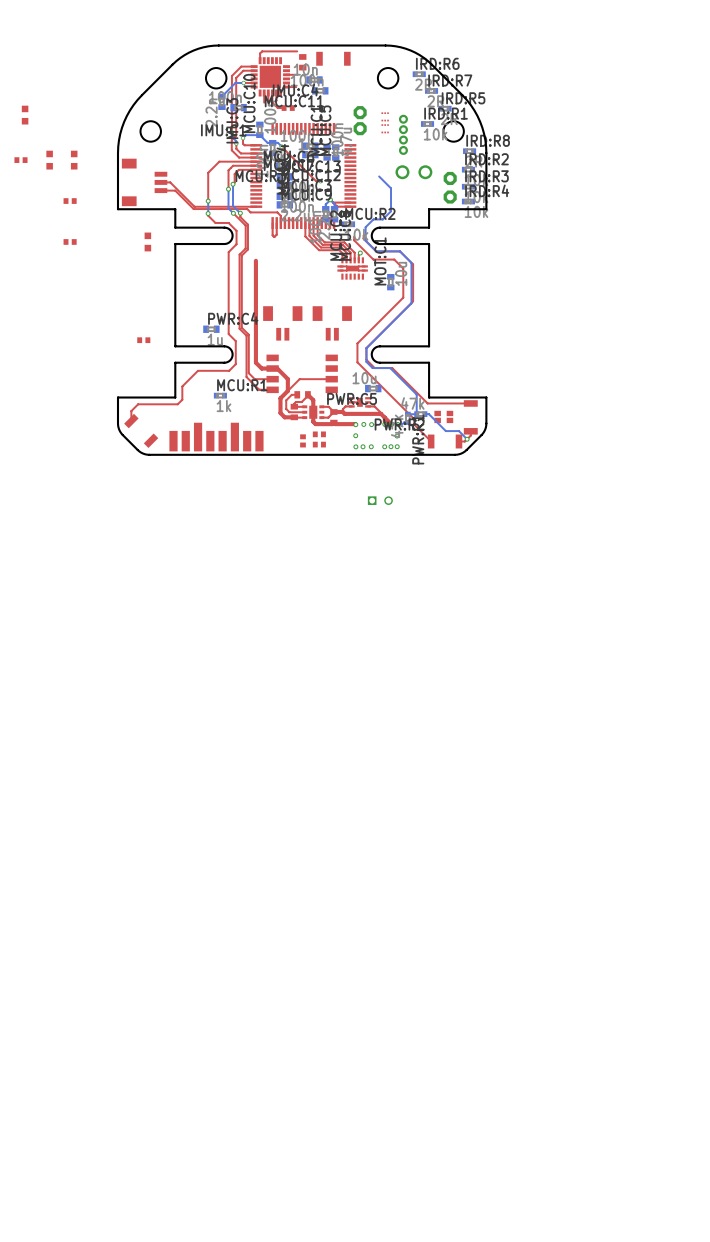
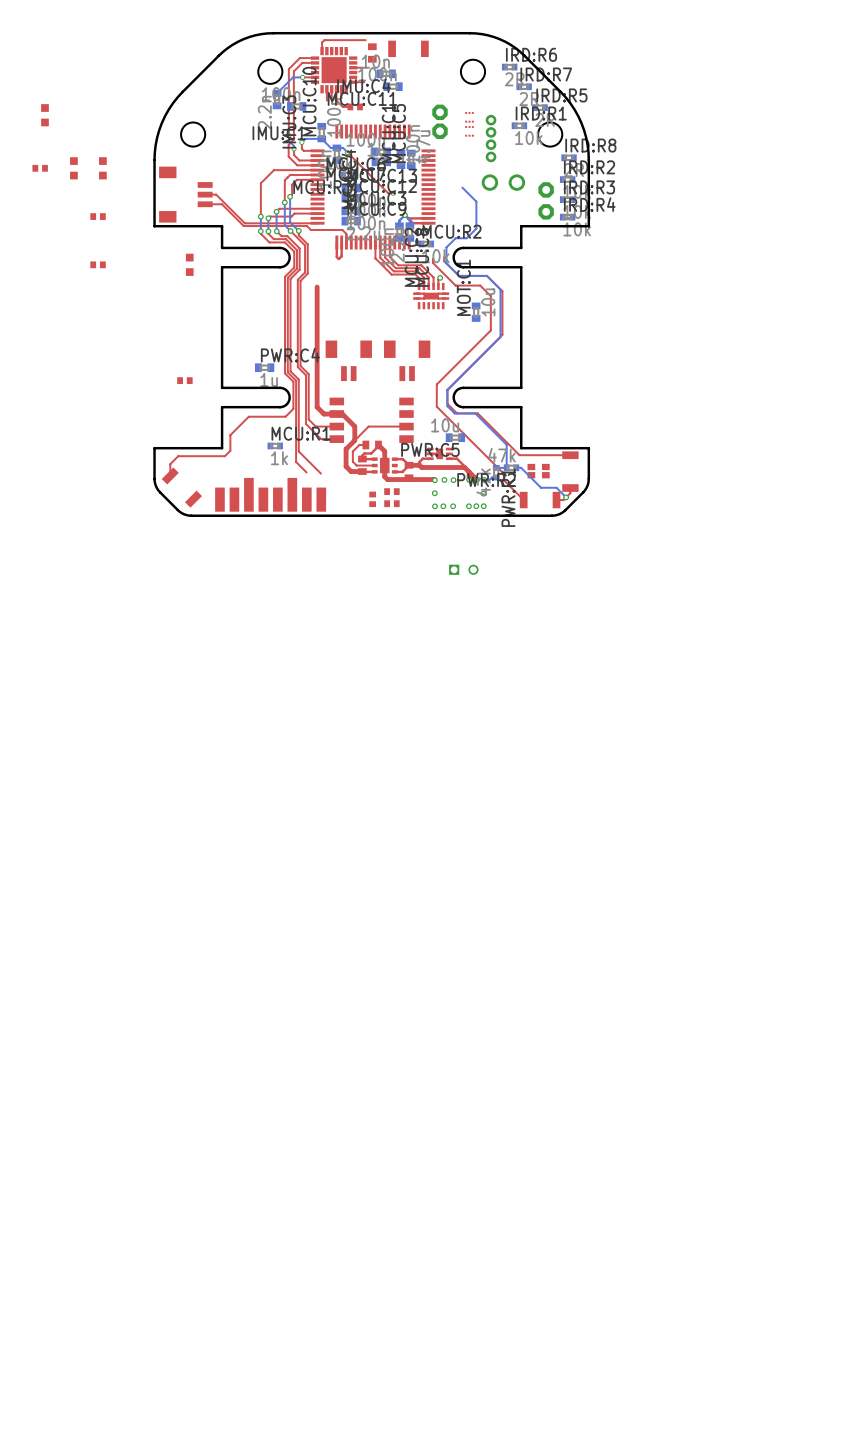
top track: none -> (317, 208) (279, 208) (276, 211)
bottom track: none -> (276, 211) (276, 231)
via: none -> (276, 211)
top track: none -> (317, 213) (294, 213) (291, 216) (270, 216) (268, 218)
bottom track: none -> (268, 218) (268, 231)
via: none -> (268, 218)
top track: none -> (268, 231) (273, 239) (285, 239) (296, 250) (296, 268) (287, 277) (287, 372) (296, 380) (296, 461) (306, 472)
via: none -> (268, 231)
top track: none -> (276, 231) (281, 236) (287, 236) (299, 248) (299, 269) (290, 278) (290, 371) (298, 379) (298, 451) (321, 473)
via: none -> (276, 231)

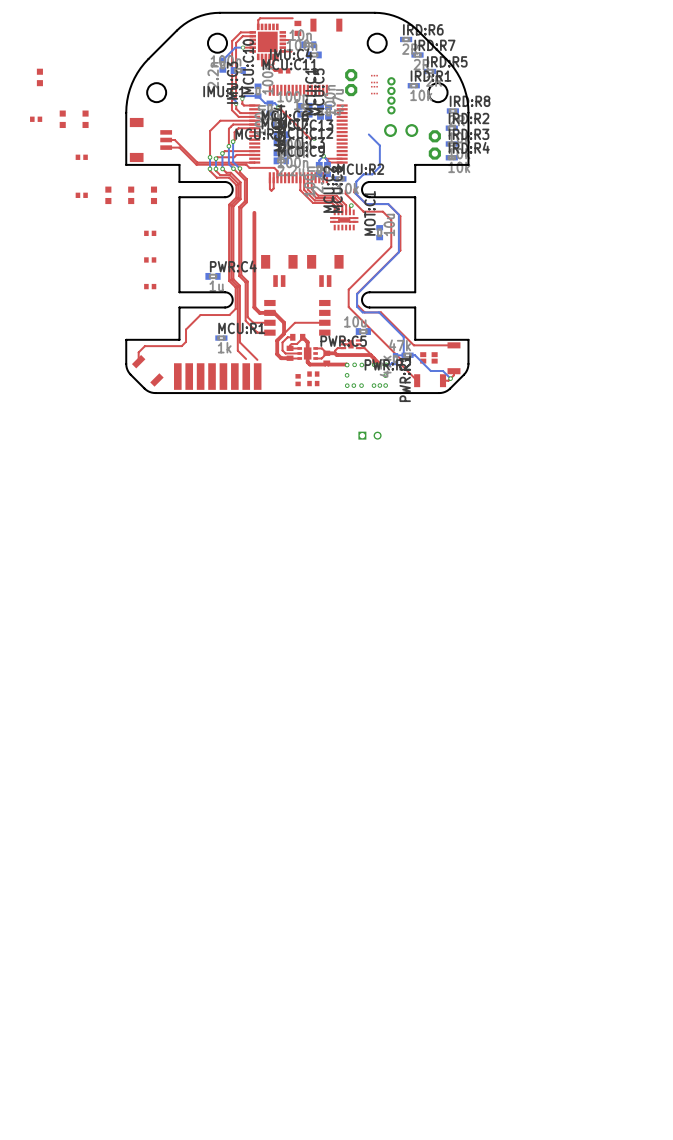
part: none -> (108, 195)
part: none -> (131, 195)
part: none -> (150, 233)
part: none -> (150, 259)
part footprint: [215, 477, 327, 512] -> [174, 363, 262, 390]

